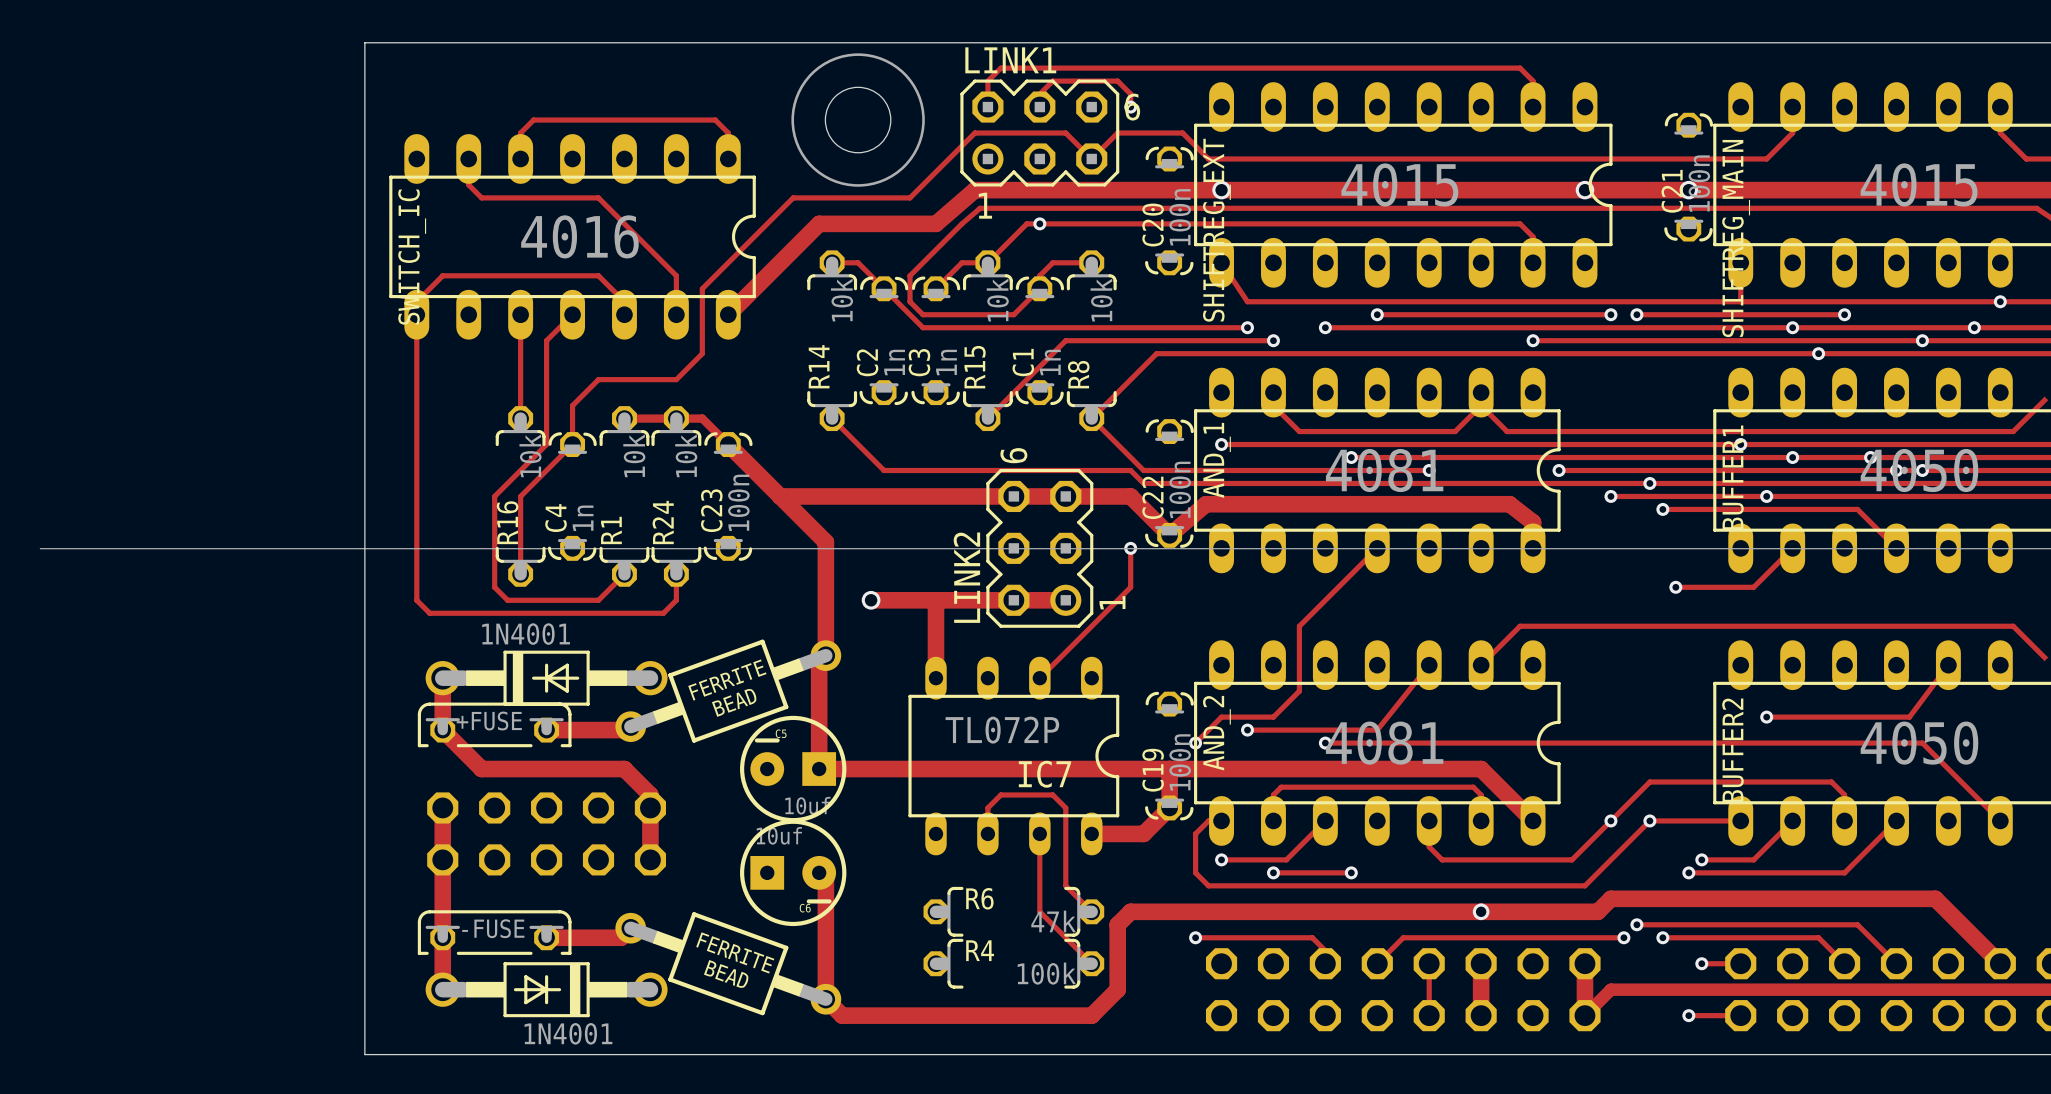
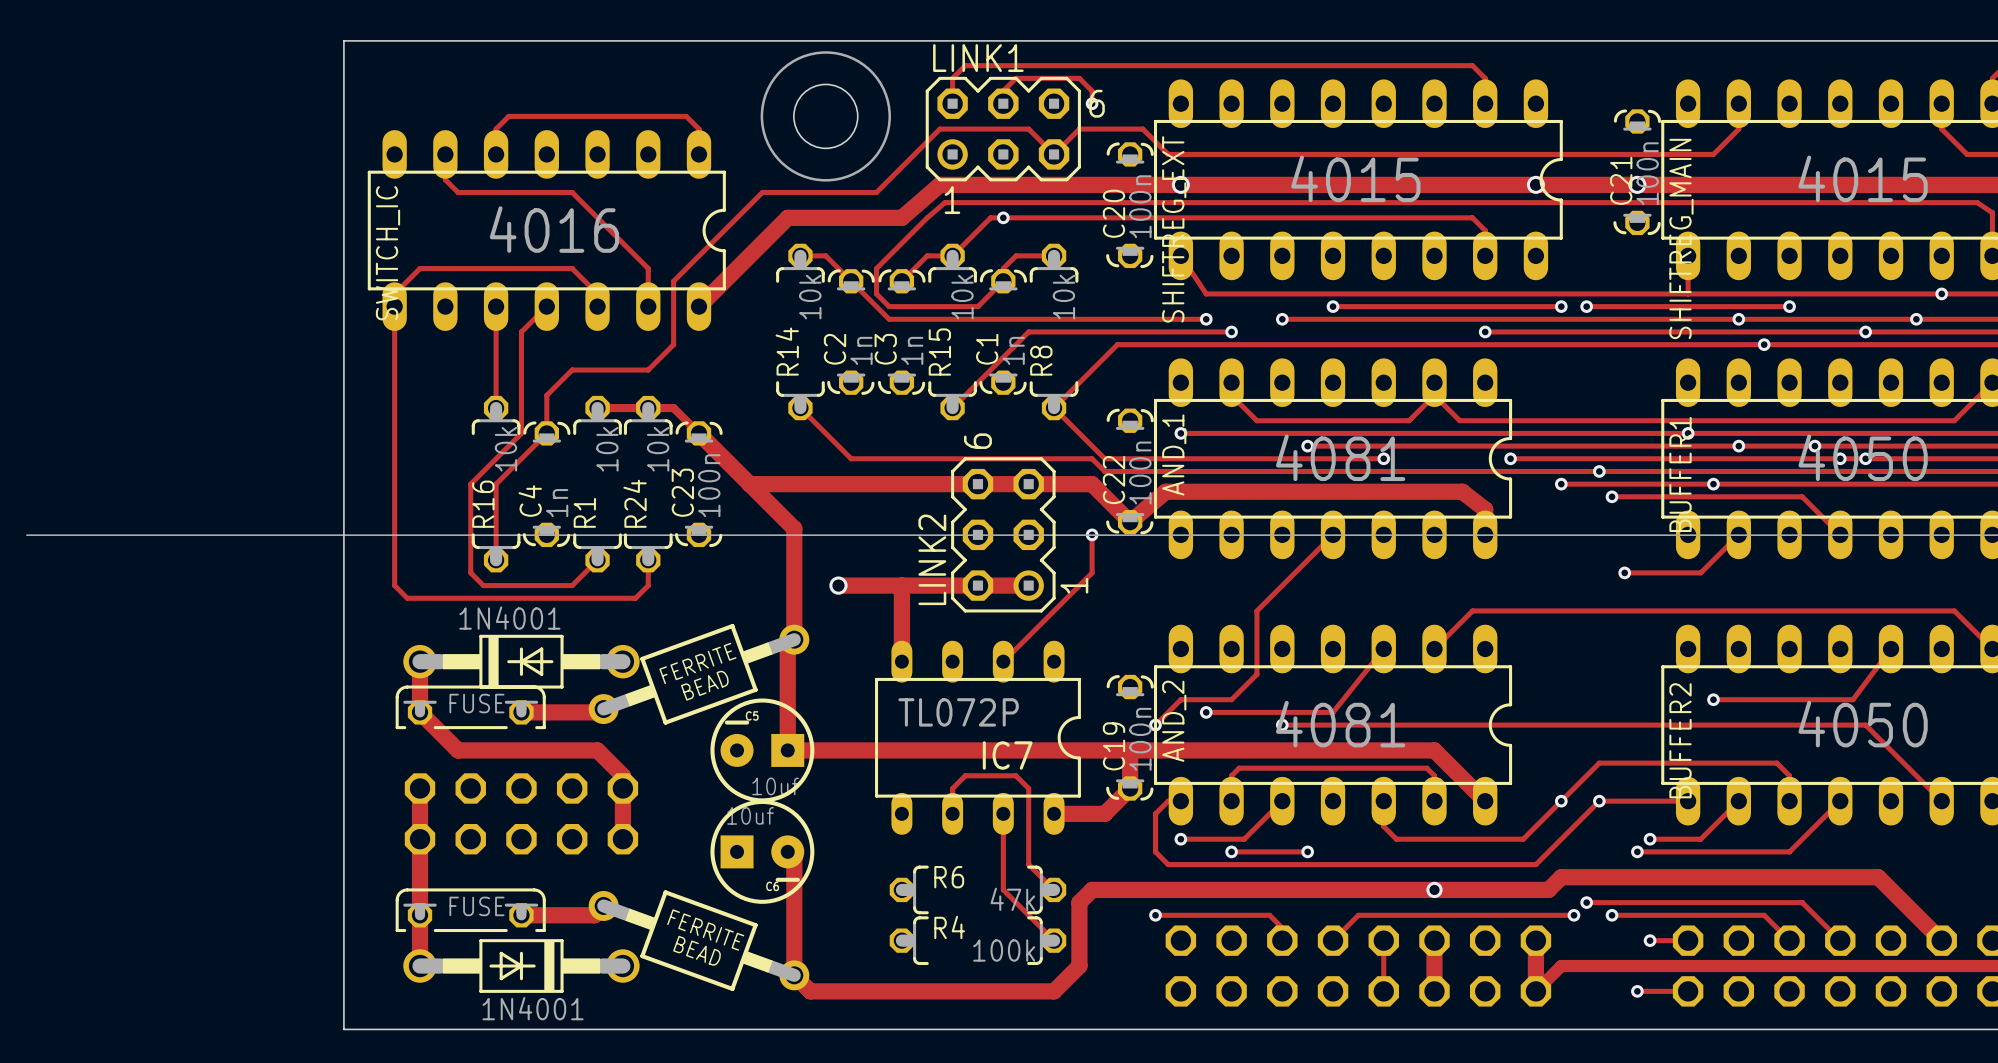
part value: +FUSE (489, 721) -> FUSE (476, 703)
part value: -FUSE (493, 928) -> FUSE (476, 906)

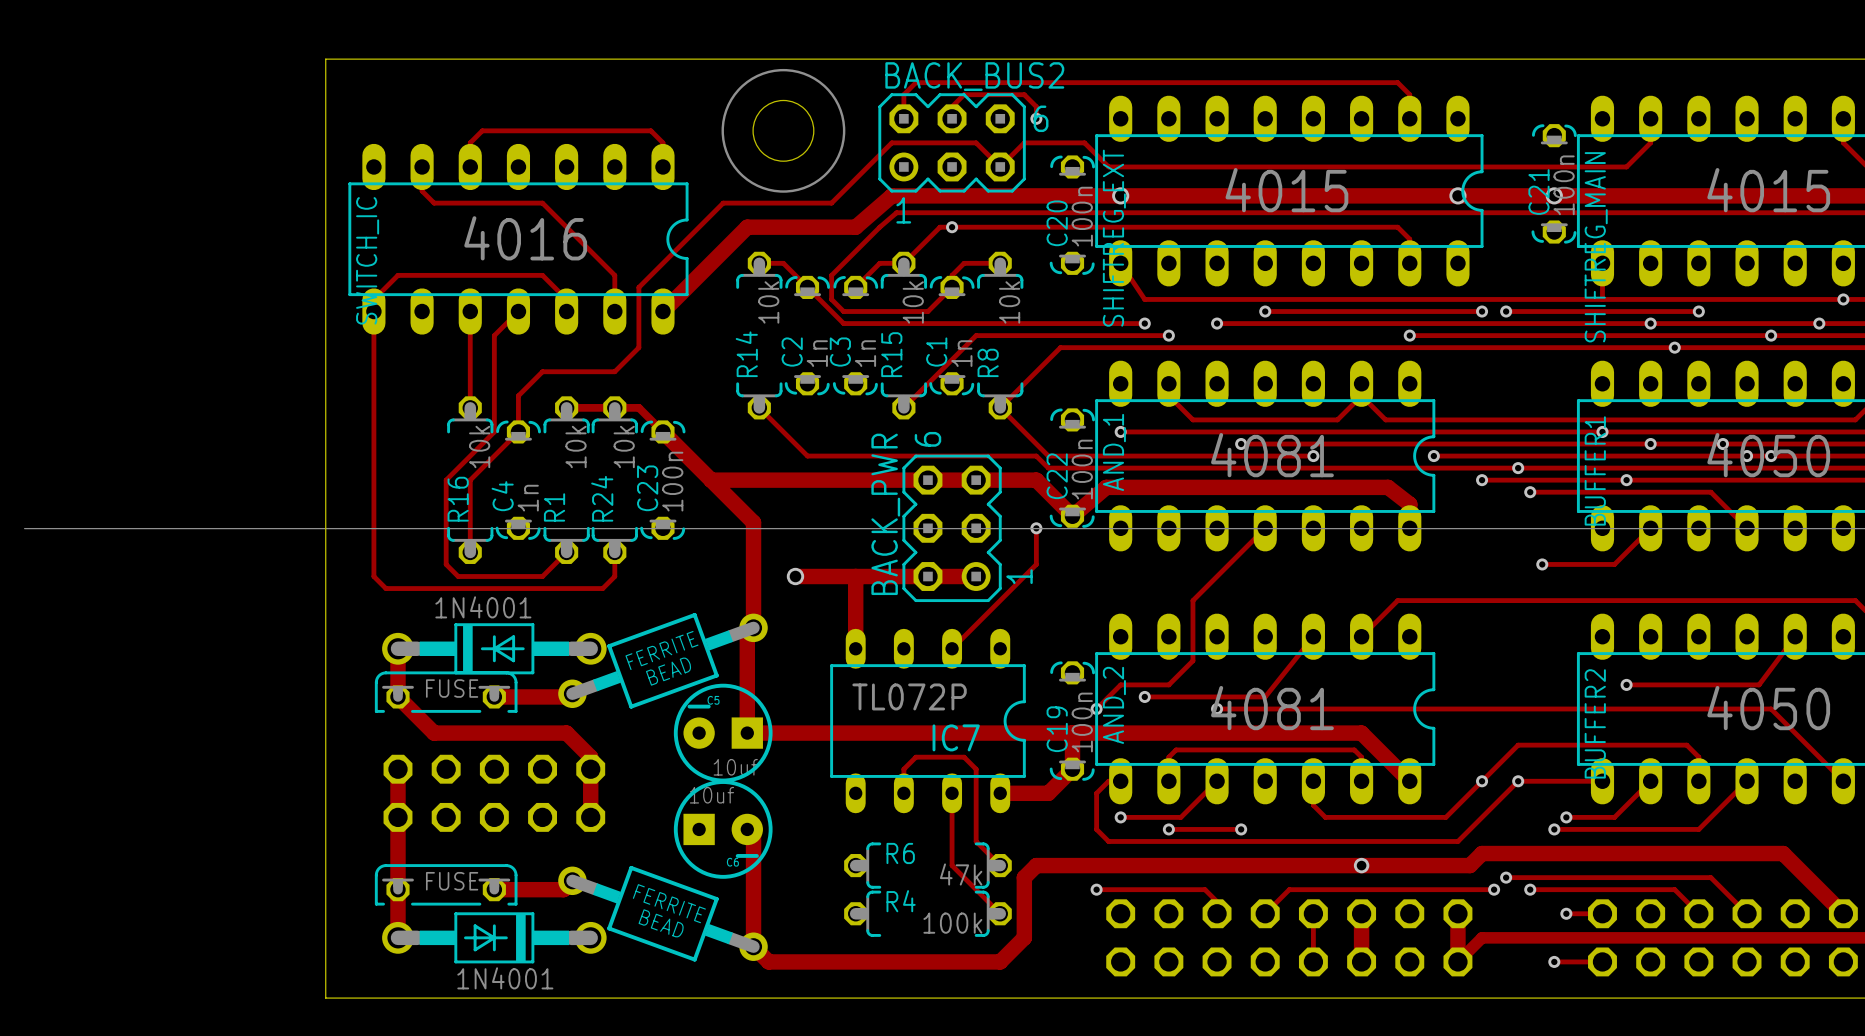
LINK1 name: LINK1 (978, 58) -> BACK_BUS2 (974, 76)
LINK2 name: LINK2 (932, 559) -> BACK_PWR (885, 514)

